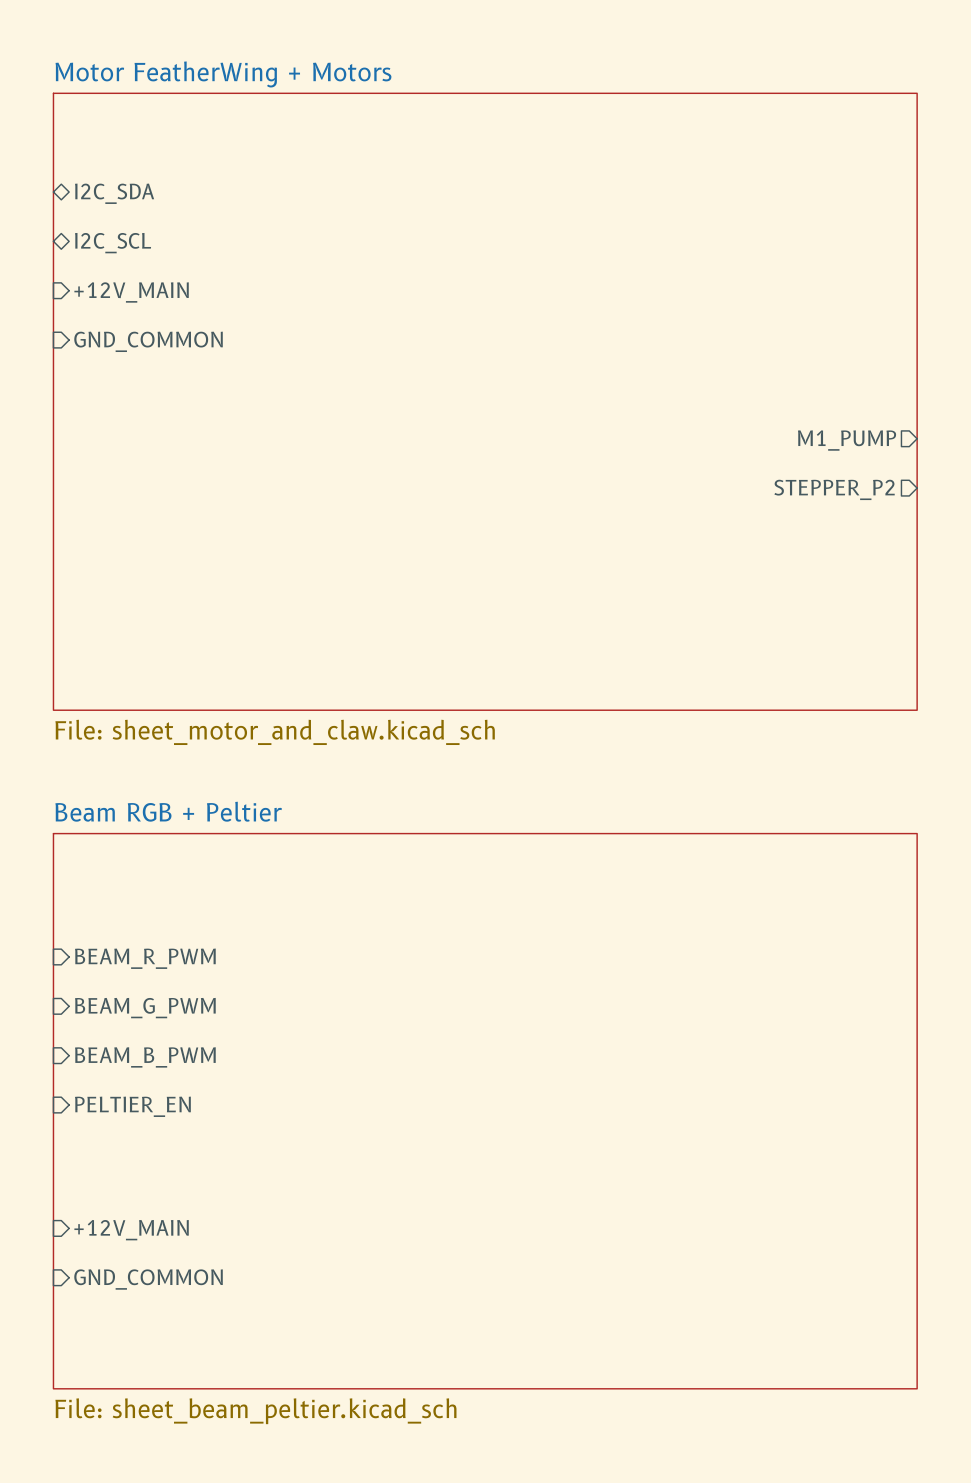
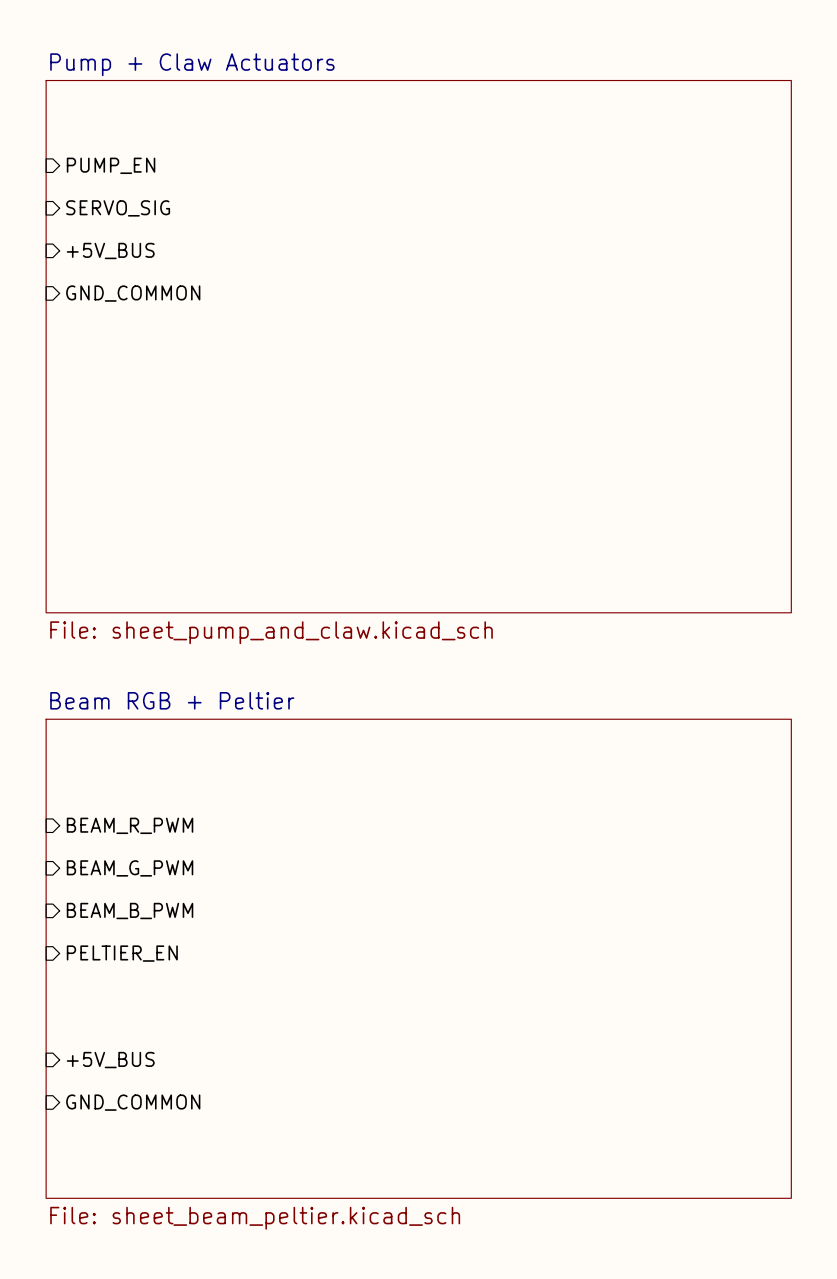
sheet Motor FeatherWing + Motors name: Motor FeatherWing + Motors (223, 74) -> Pump + Claw Actuators (192, 64)
sheet pin shape: bidirectional (114, 193) -> input (111, 165)
sheet pin: I2C_SDA (114, 193) -> PUMP_EN (111, 165)
sheet pin shape: bidirectional (113, 243) -> input (118, 208)
sheet pin: I2C_SCL (113, 243) -> SERVO_SIG (118, 208)
sheet pin: +12V_MAIN (131, 292) -> +5V_BUS (110, 250)
sheet pin: M1_PUMP (847, 440) -> none
sheet pin: STEPPER_P2 (834, 489) -> none
sheet Motor FeatherWing + Motors value: File: sheet_motor_and_claw.kicad_sch (275, 732) -> File: sheet_pump_and_claw.kicad_sch (271, 632)
sheet pin: +12V_MAIN (131, 1230) -> +5V_BUS (110, 1060)

